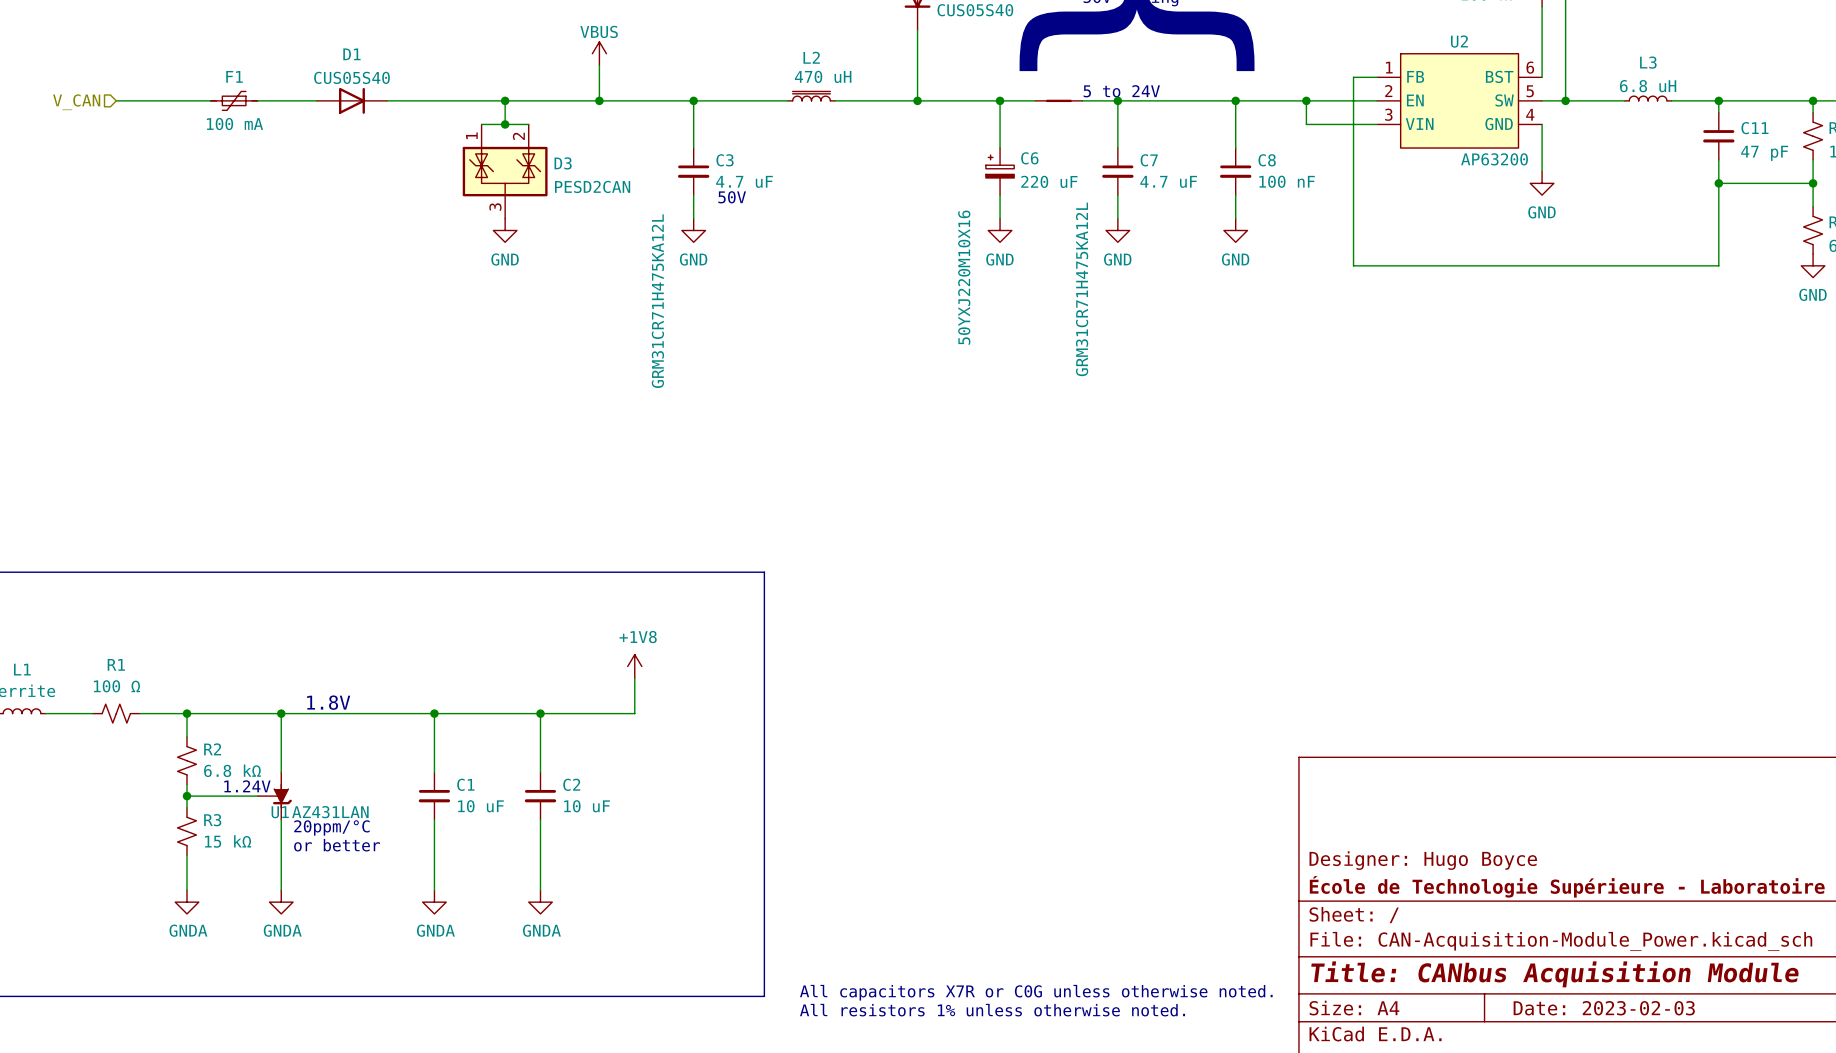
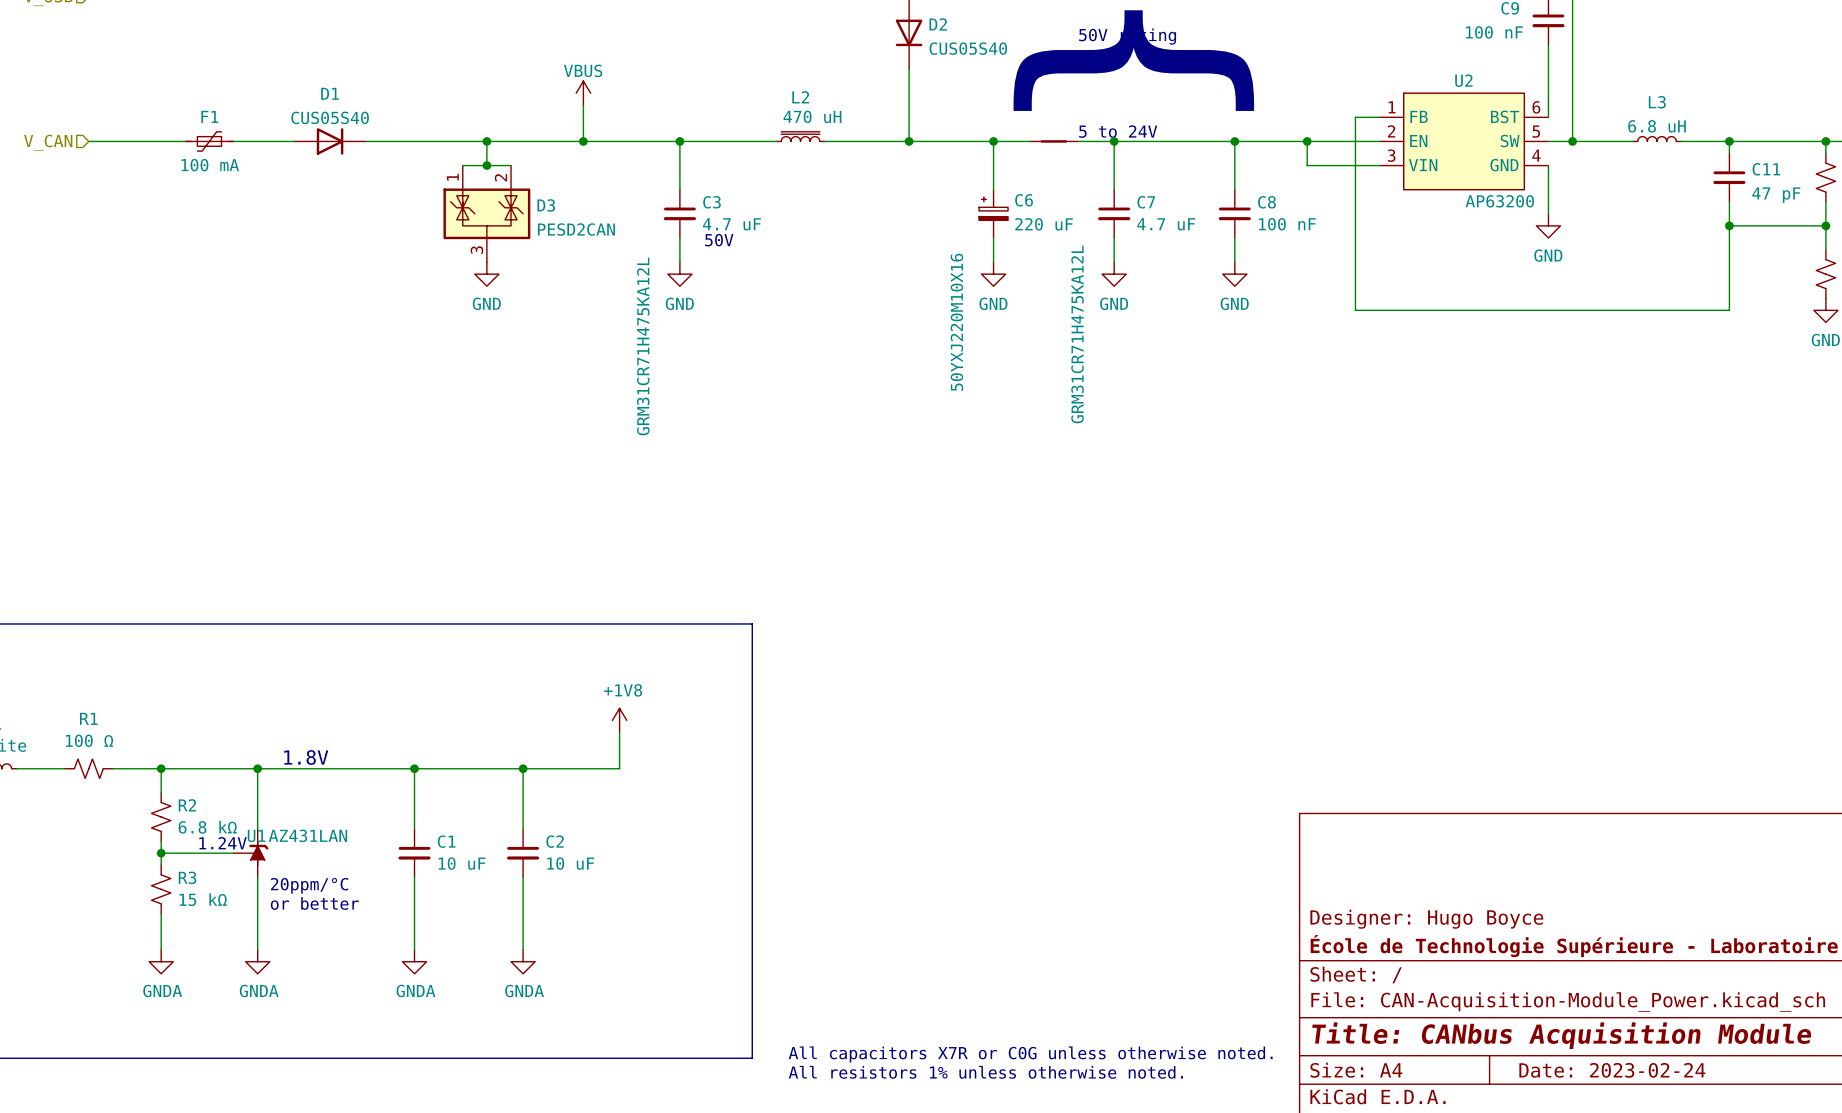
U1 flip: as is (282, 796) -> up-down (258, 853)
title block: Date: 2023-02-03 (1604, 1008) -> Date: 2023-02-24 (1612, 1070)

